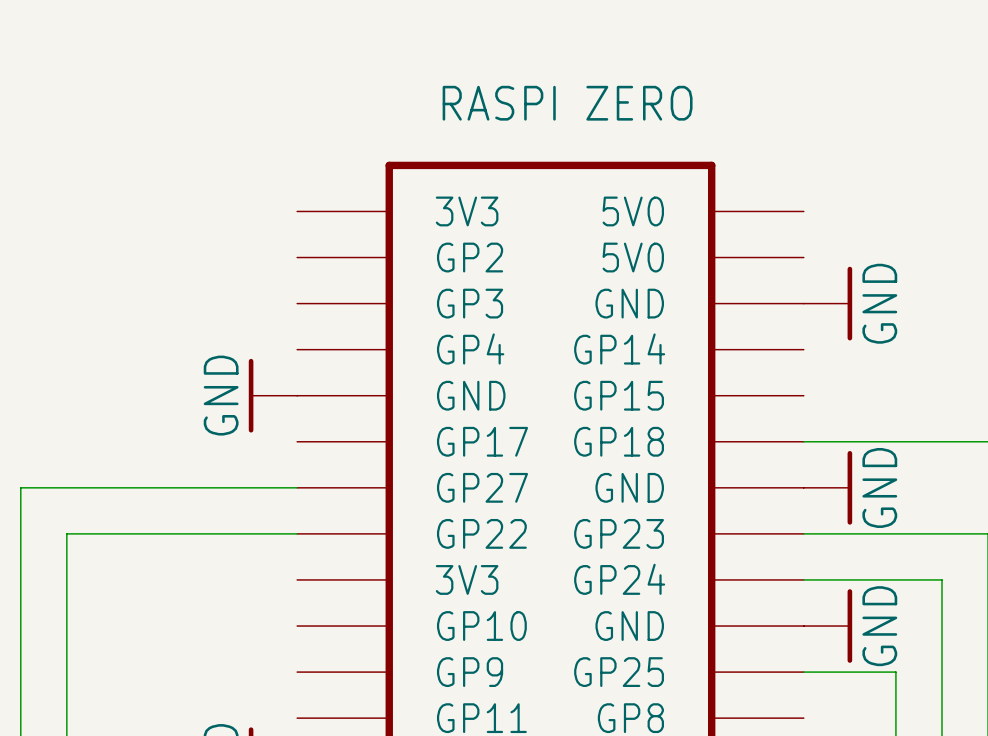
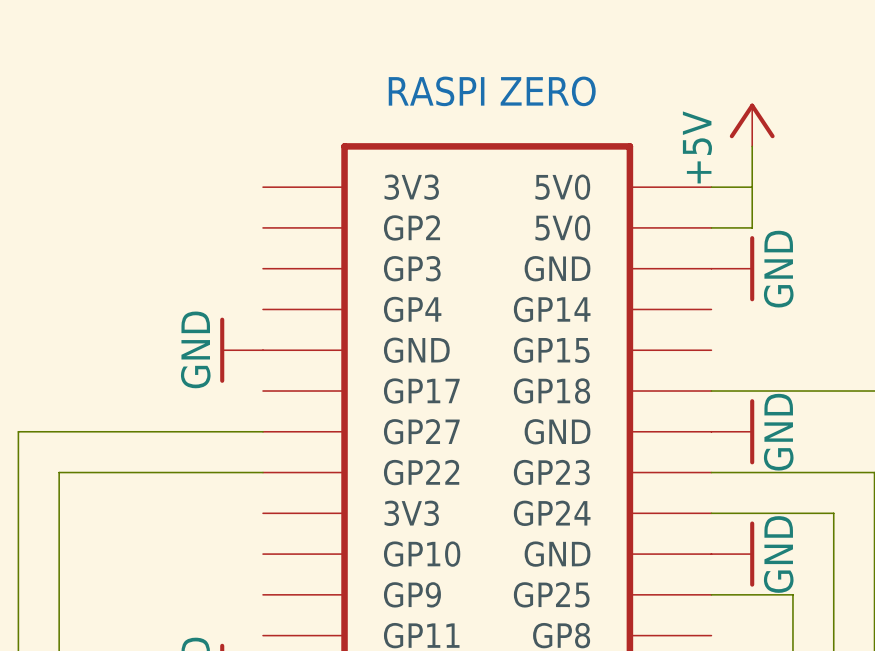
power symbol: none -> +5V (752, 124)
wire: none -> (752, 146) (752, 227) (711, 227)
wire: none -> (711, 187) (752, 187)

